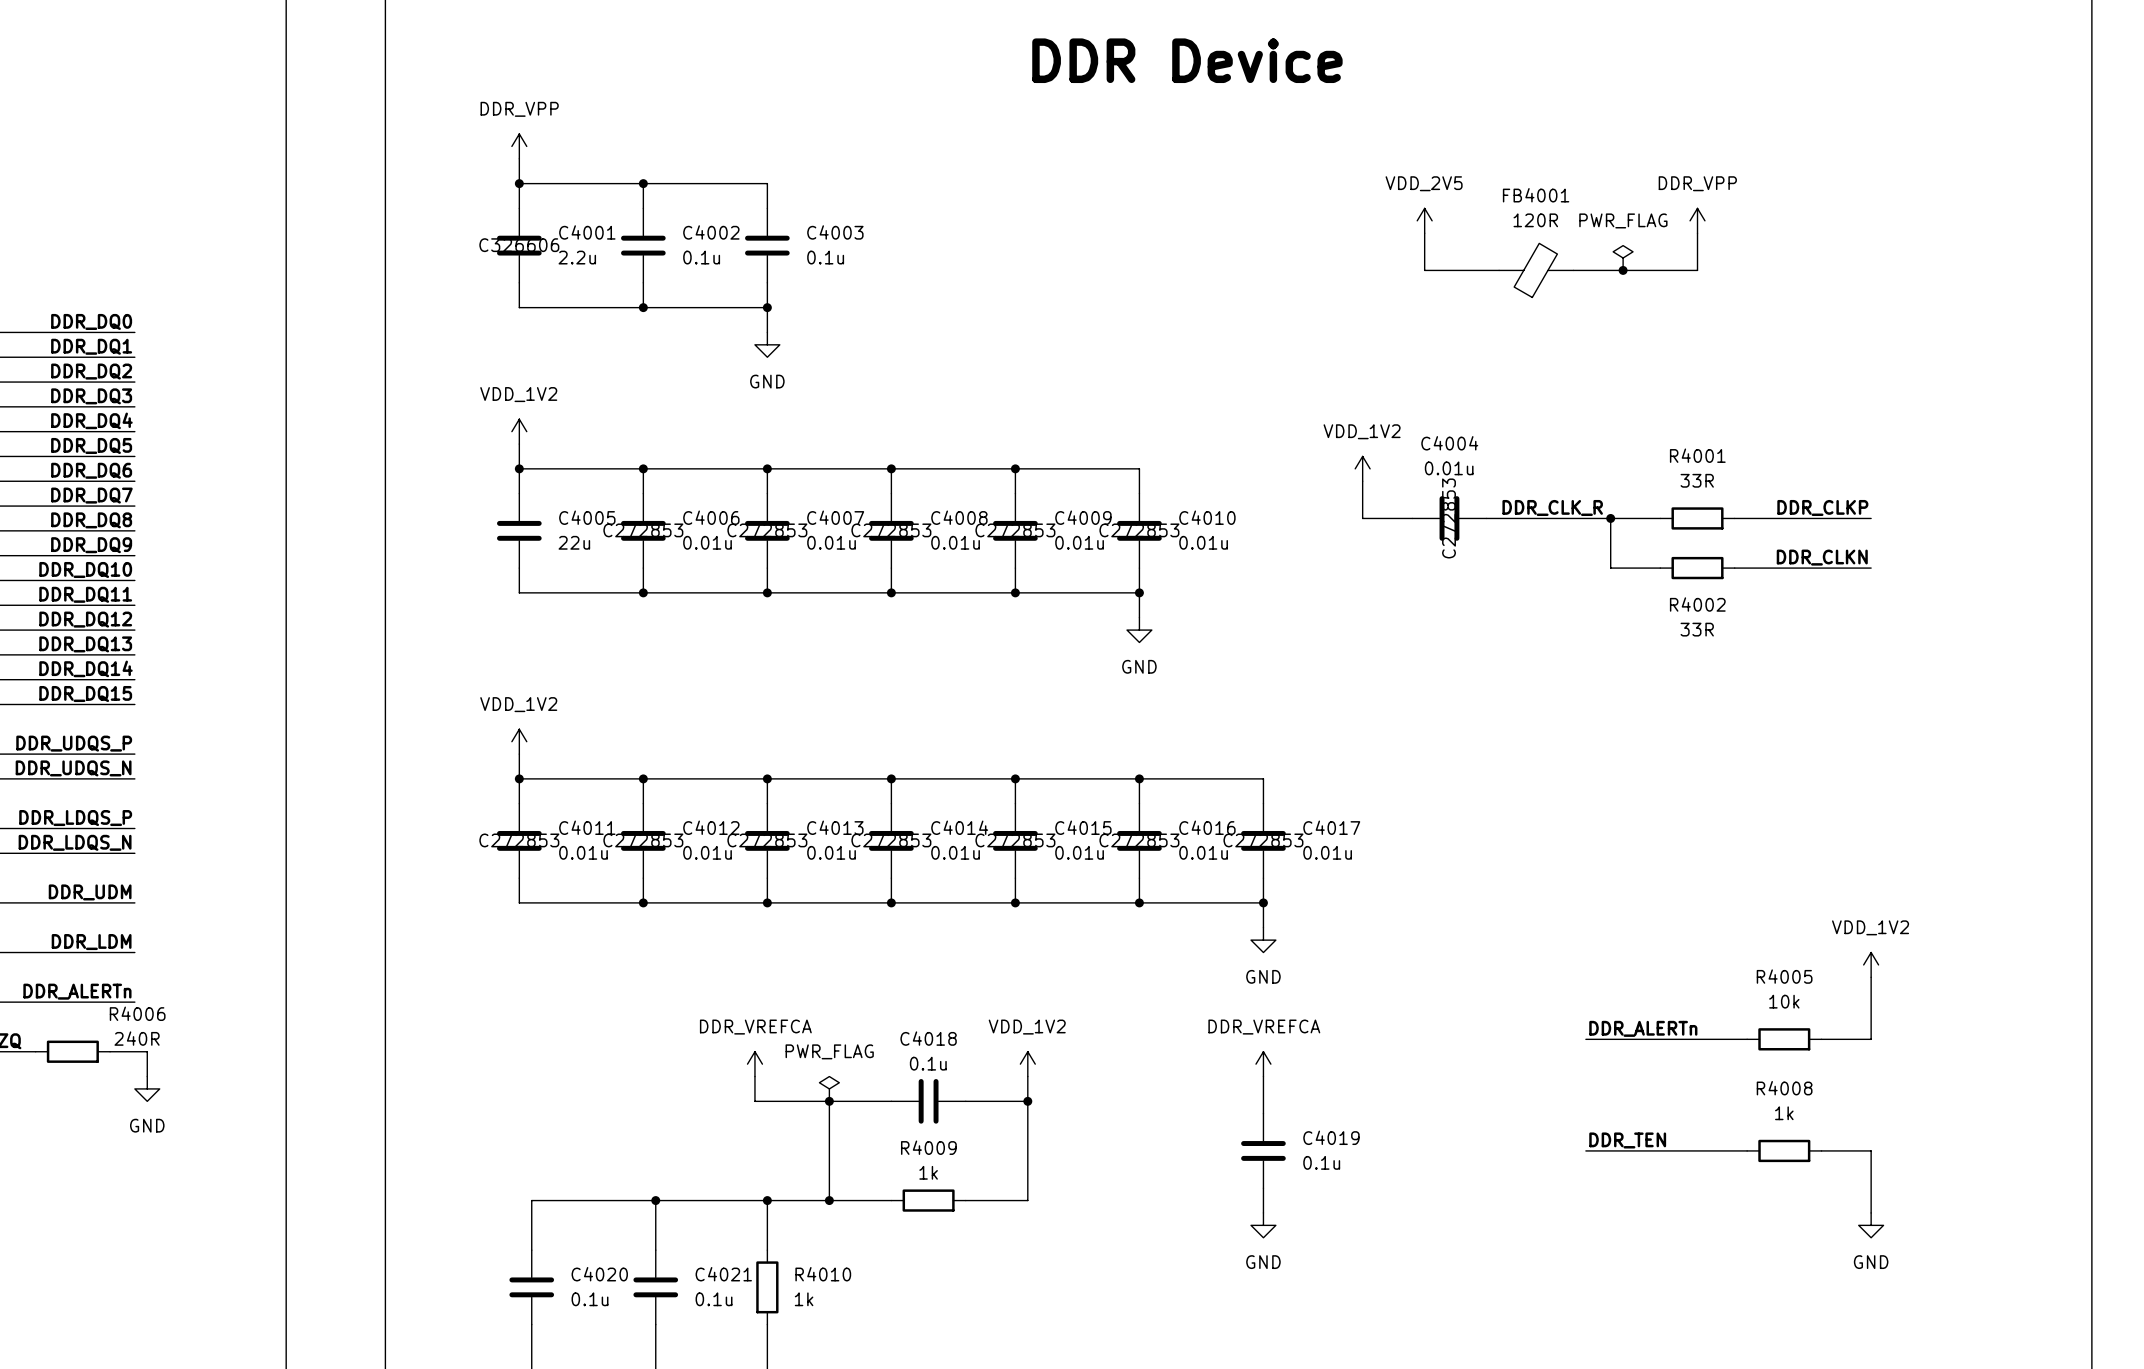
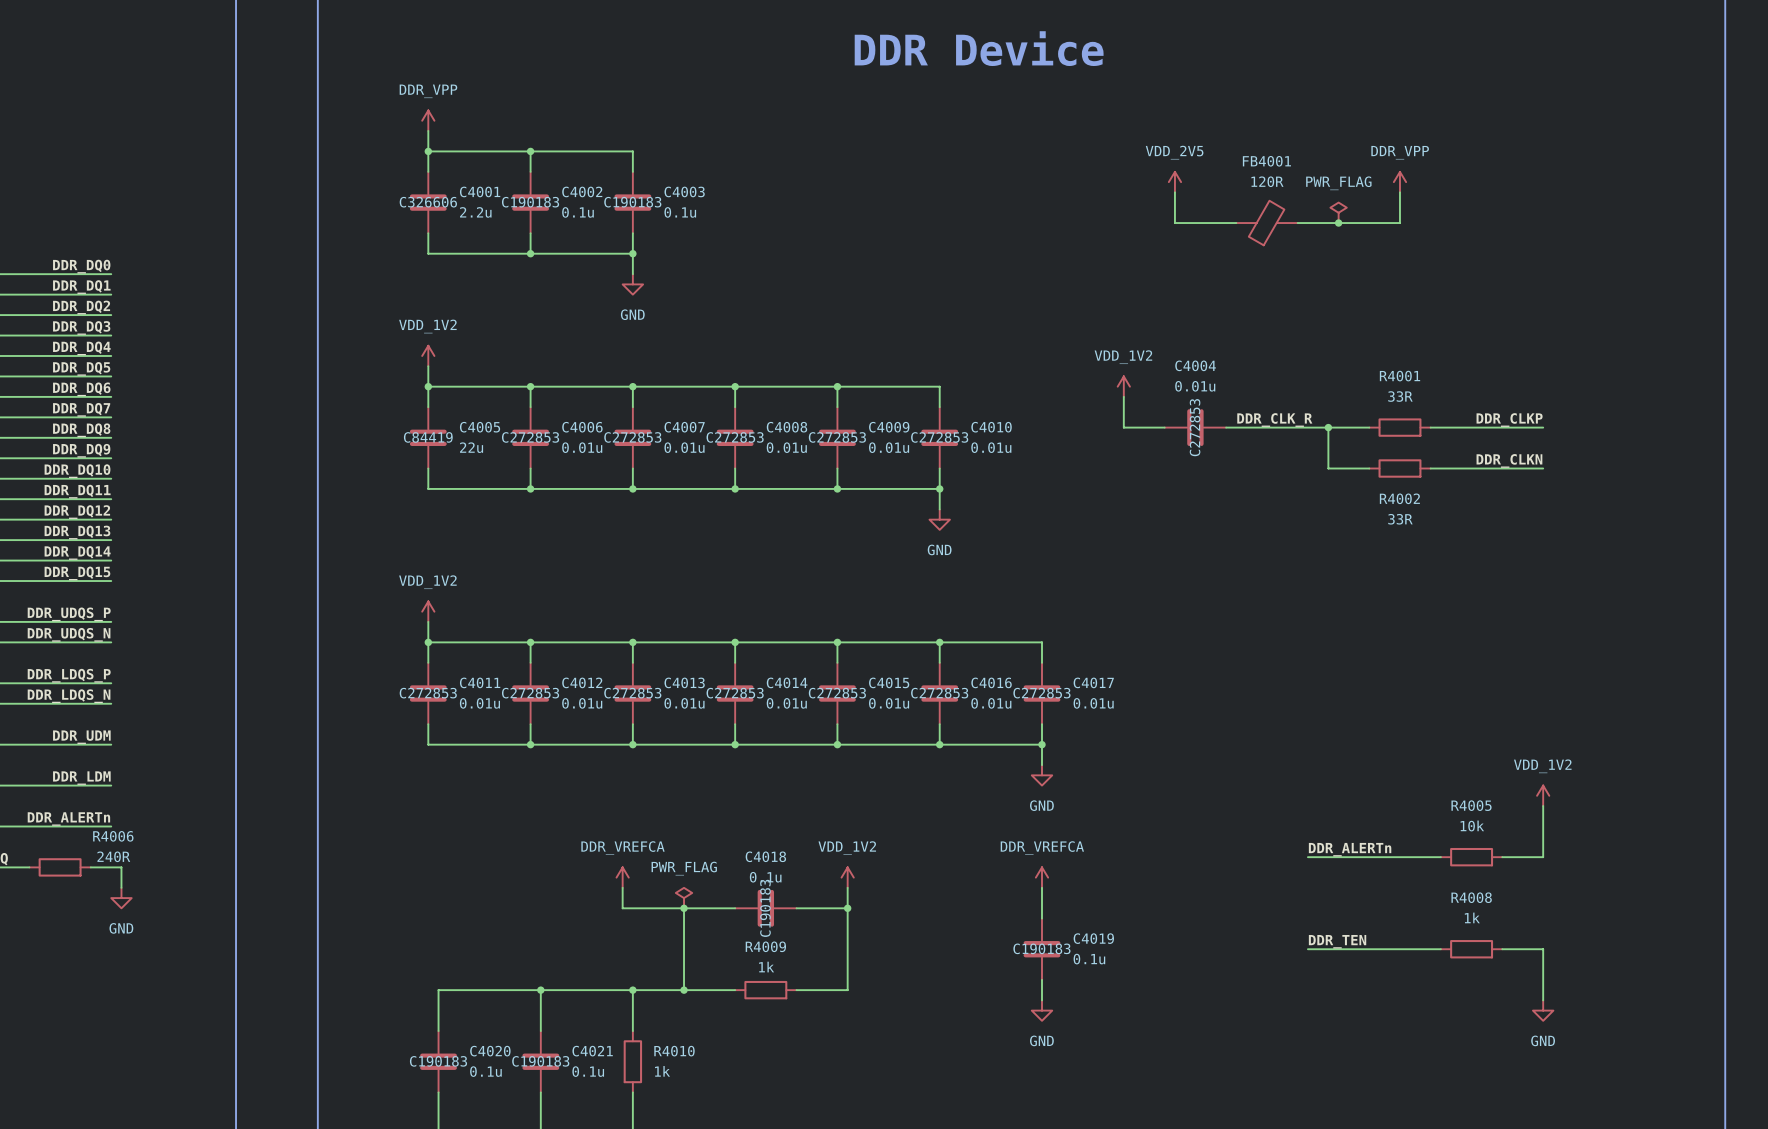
C4002 text: none -> C190183 (530, 202)
C4003 text: none -> C190183 (632, 202)
C4005 text: none -> C84419 (428, 437)
C4018 text: none -> C190183 (765, 908)
C4019 text: none -> C190183 (1041, 948)
C4020 text: none -> C190183 (438, 1061)
C4021 text: none -> C190183 (540, 1061)

